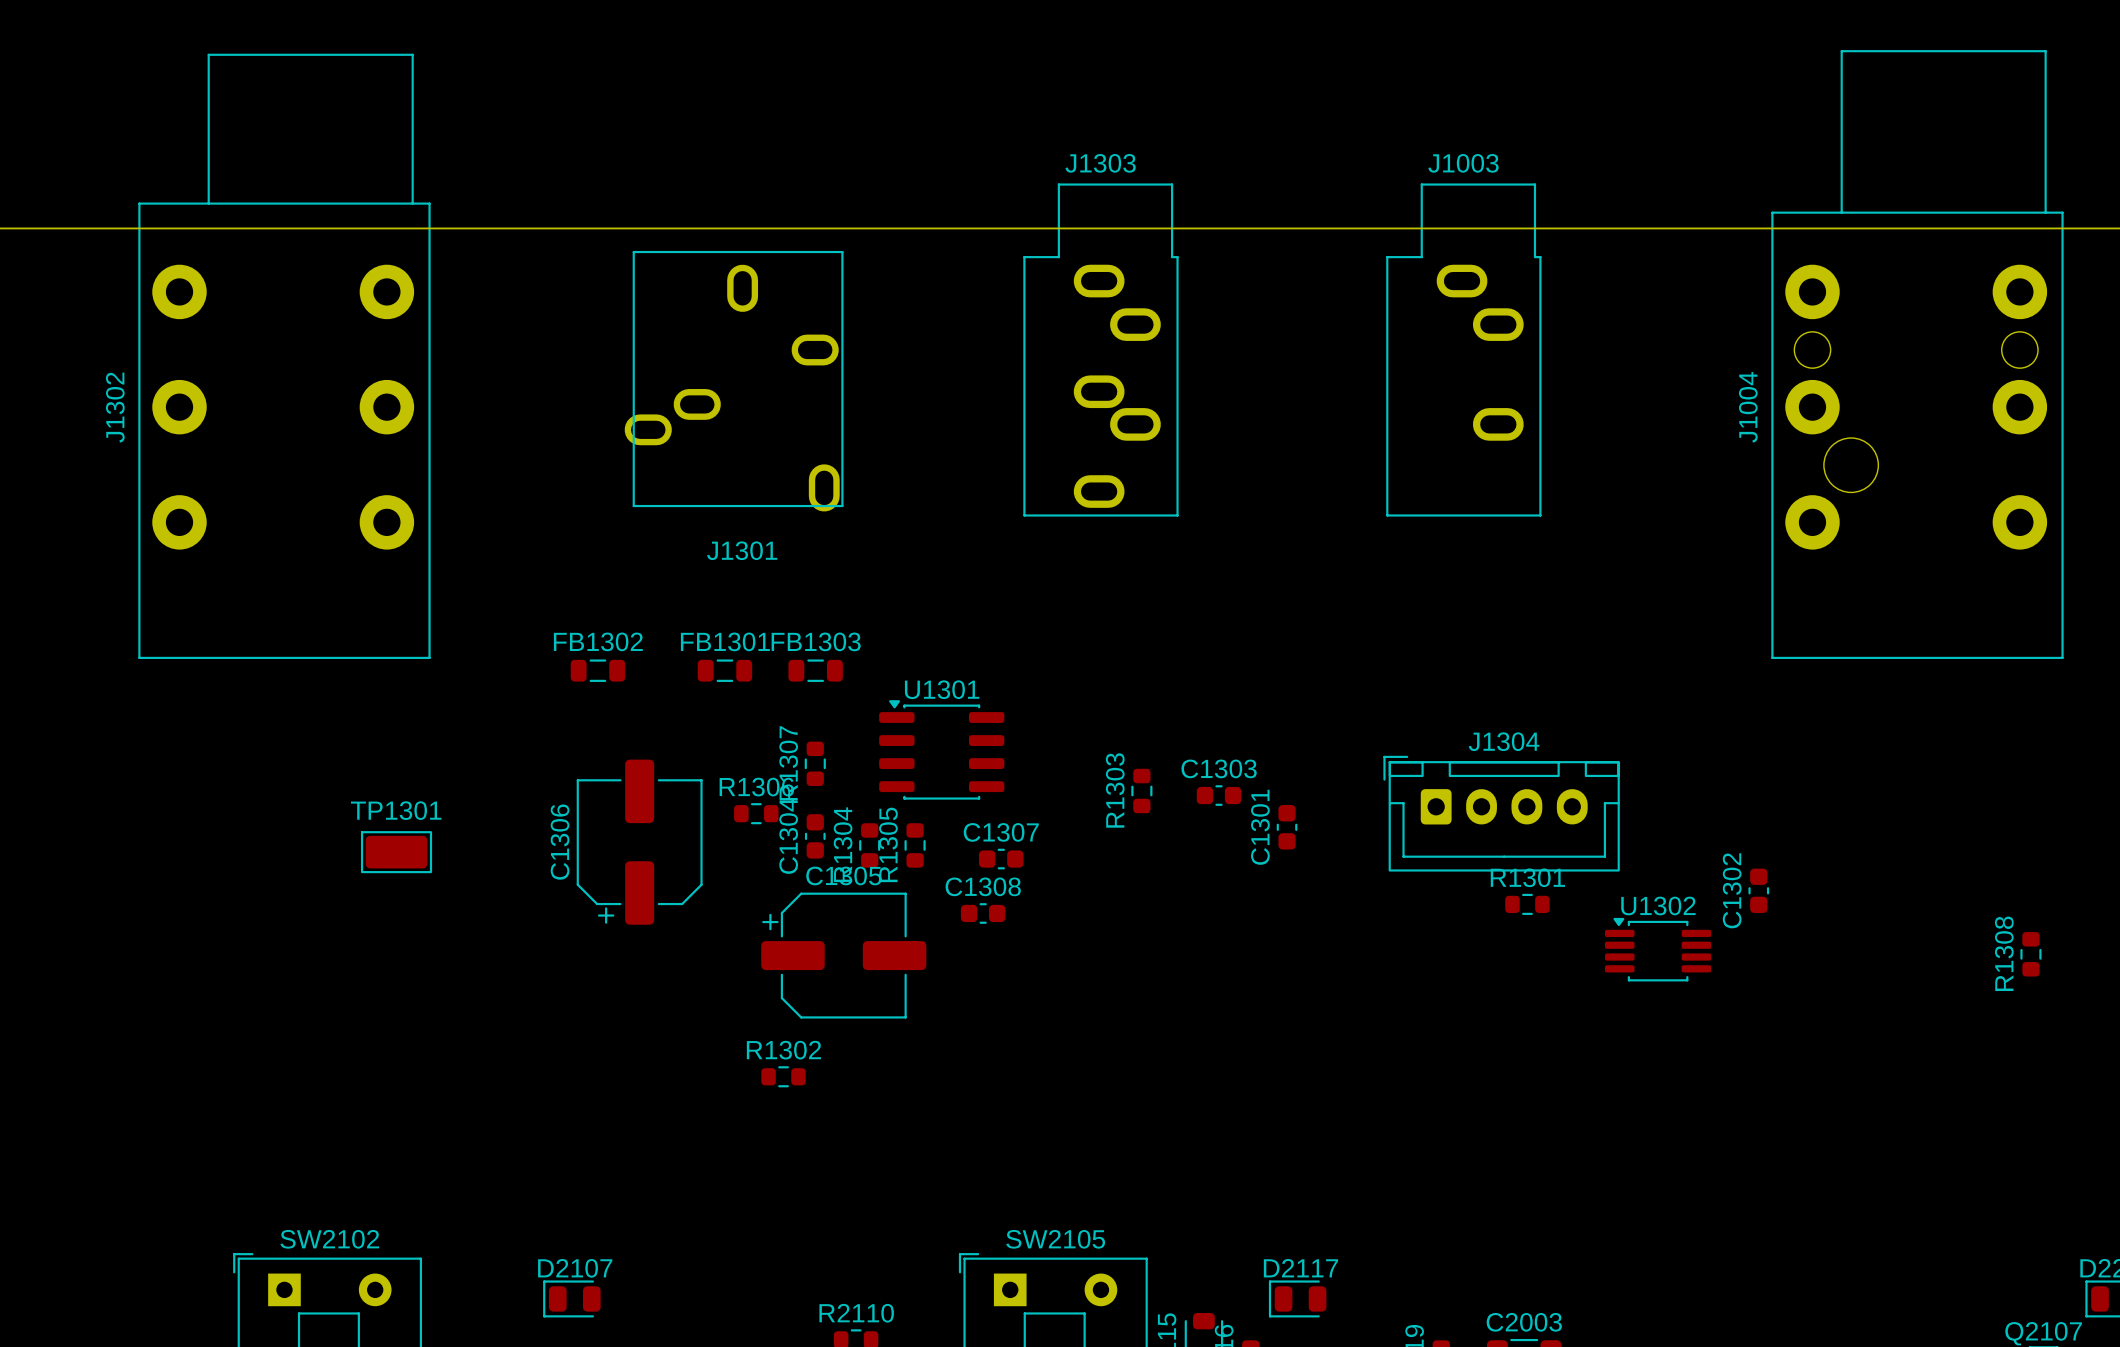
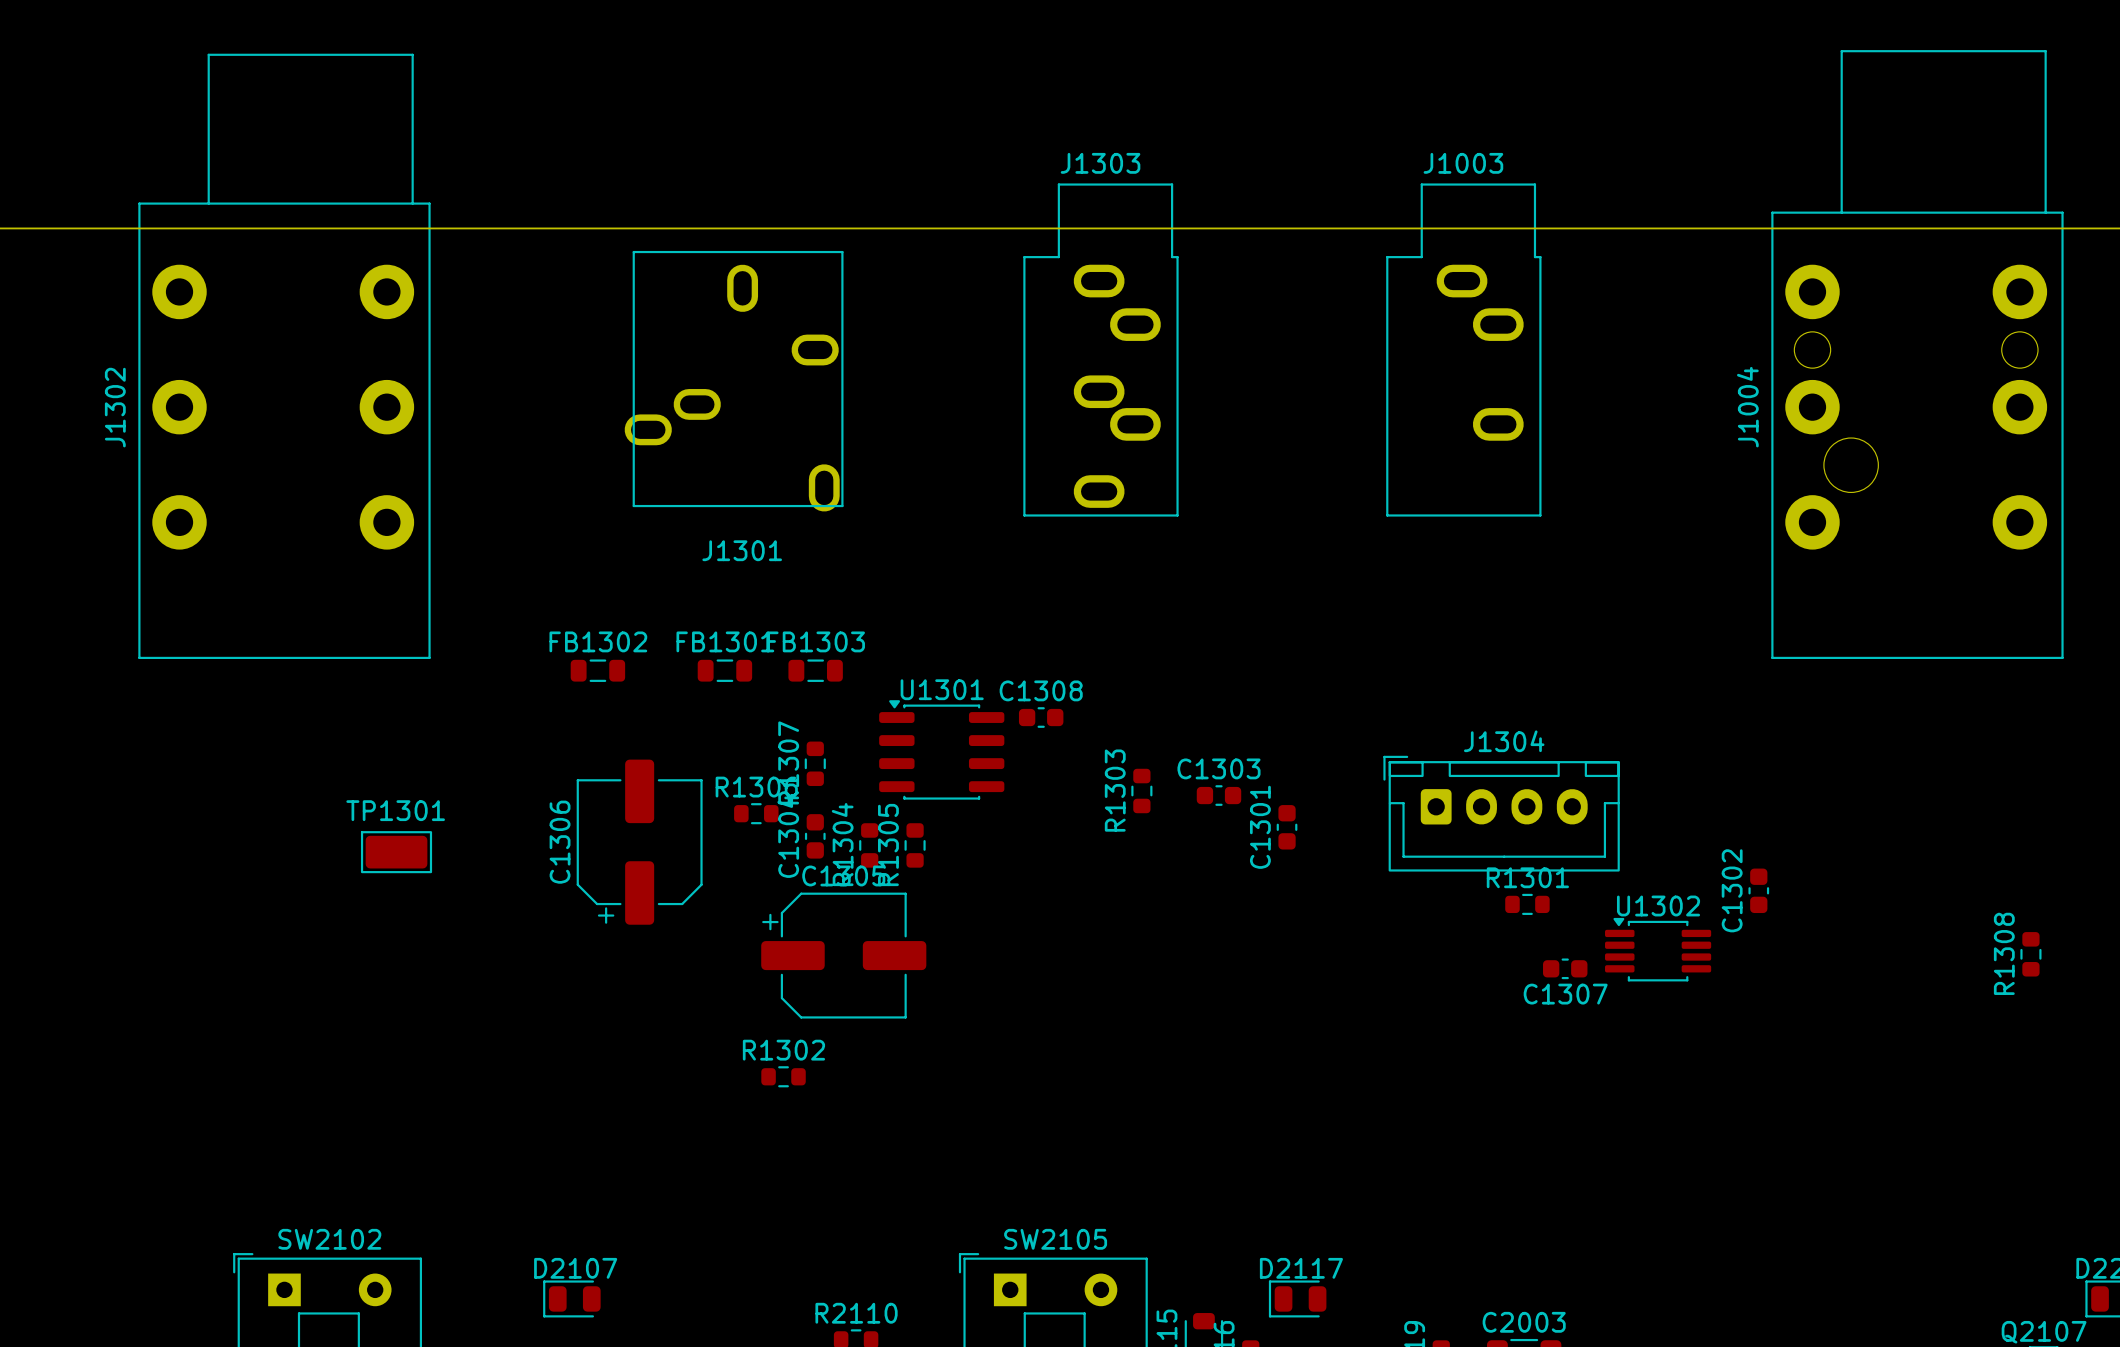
C1307 name position: C1307 (1001, 832) -> C1307 (1565, 994)
C1307 position: (1001, 859) -> (1565, 968)
C1308 position: (983, 913) -> (1041, 717)

